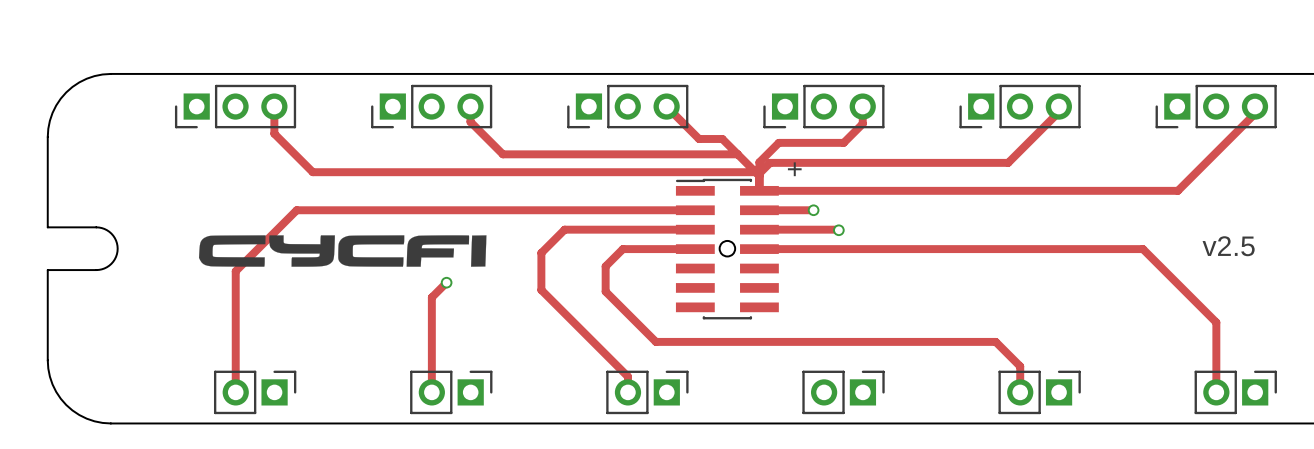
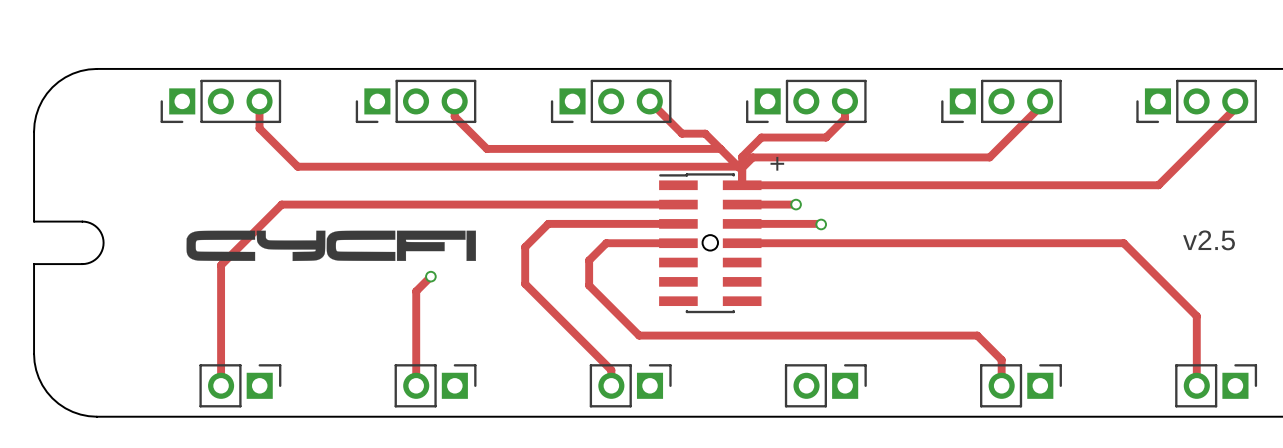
drawing shape: [198, 235, 487, 267] -> [186, 230, 476, 262]

